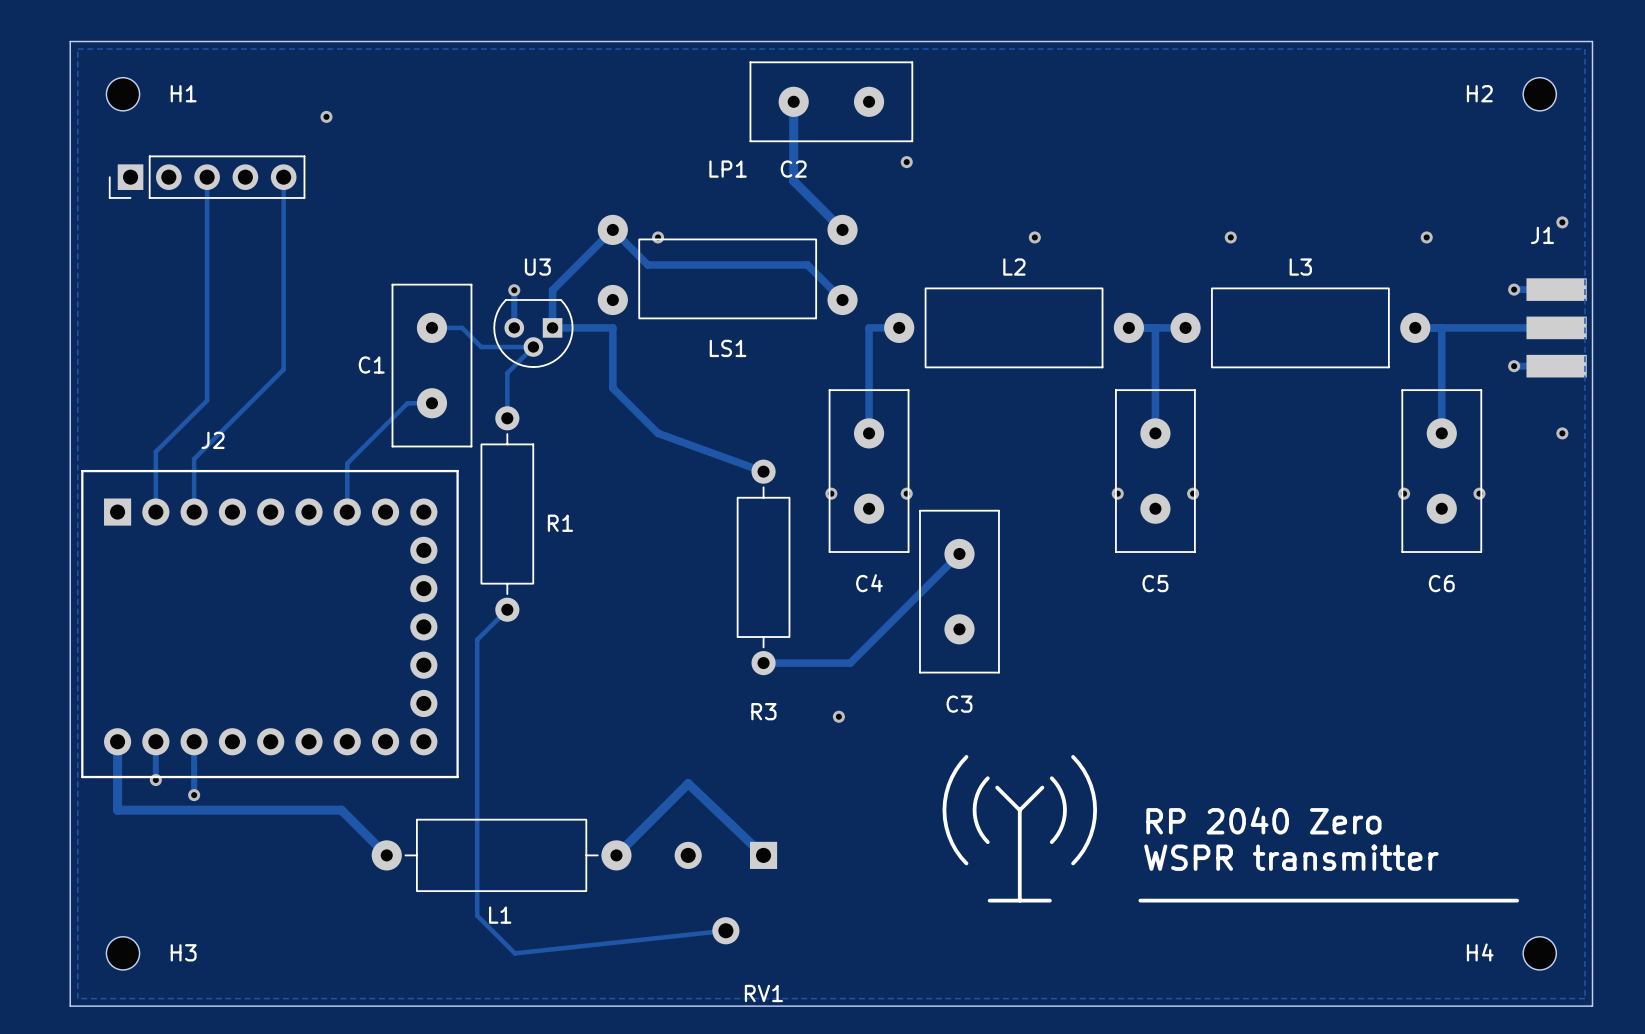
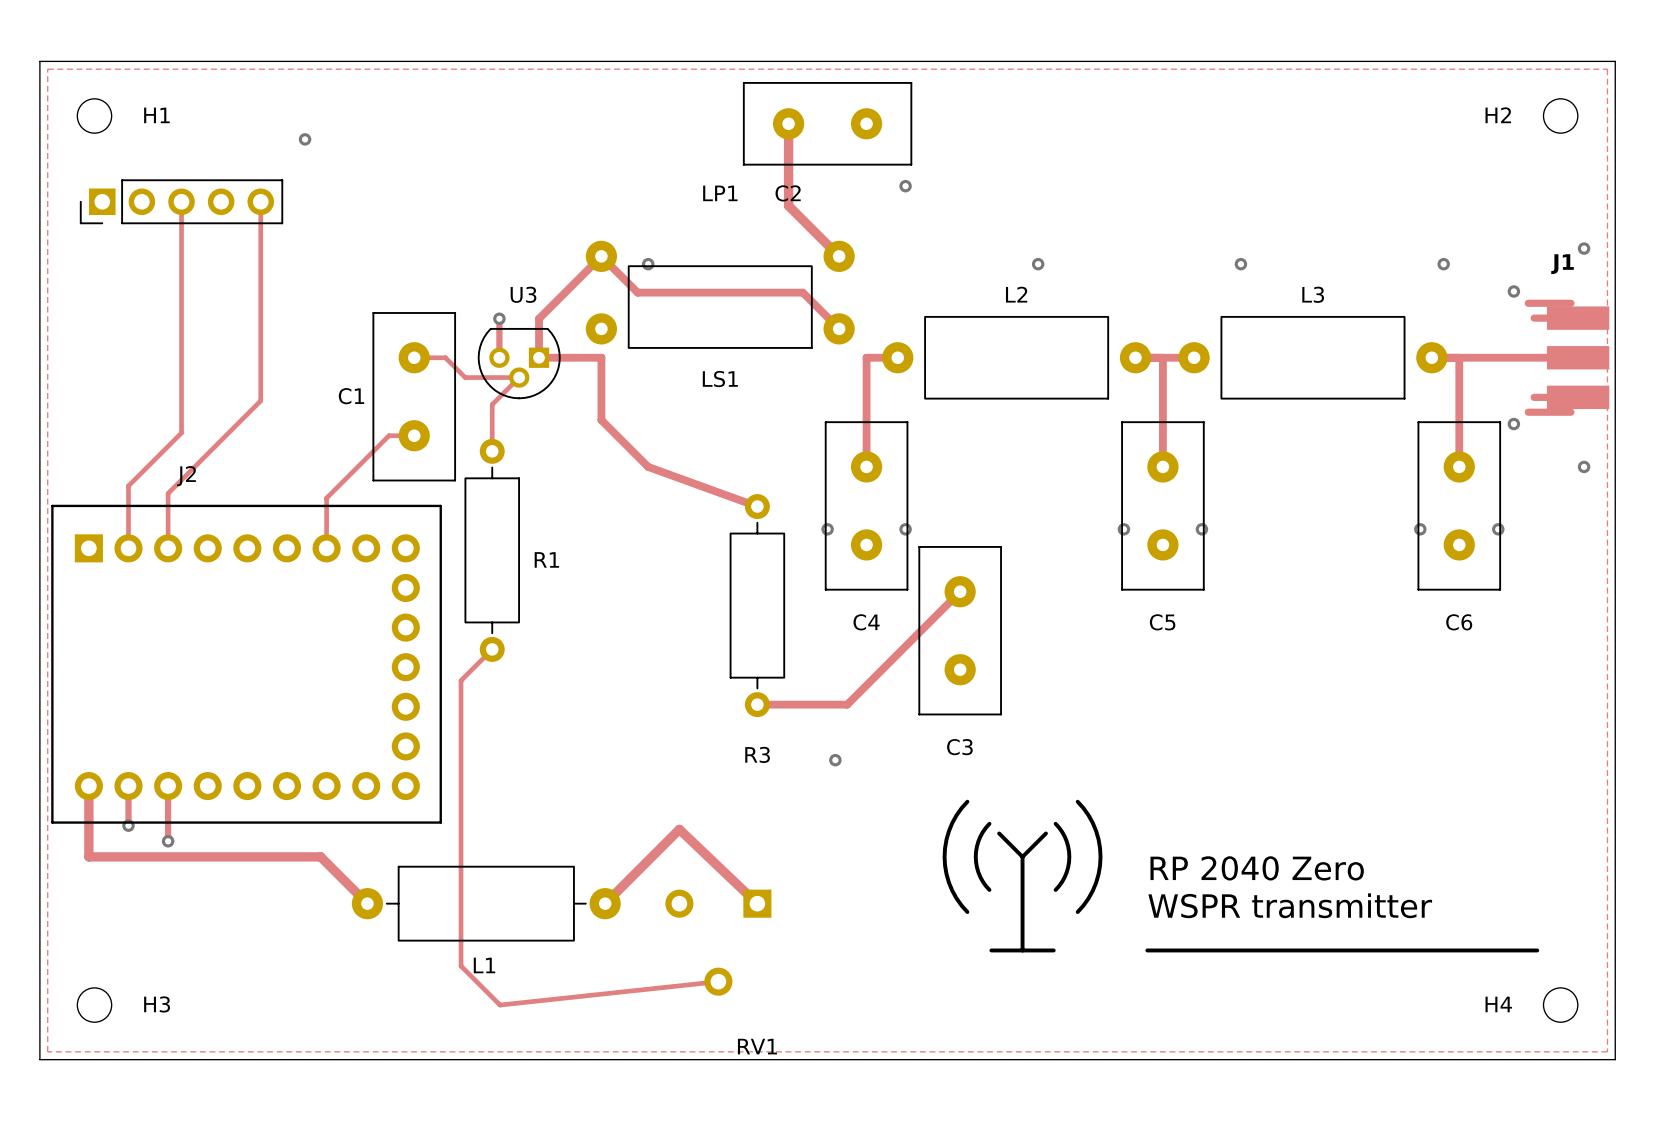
track: none -> (1528, 303) (1570, 303)
via position: (1514, 289) -> (1513, 291)
via position: (1514, 366) -> (1513, 424)
track: none -> (1528, 412) (1570, 412)

